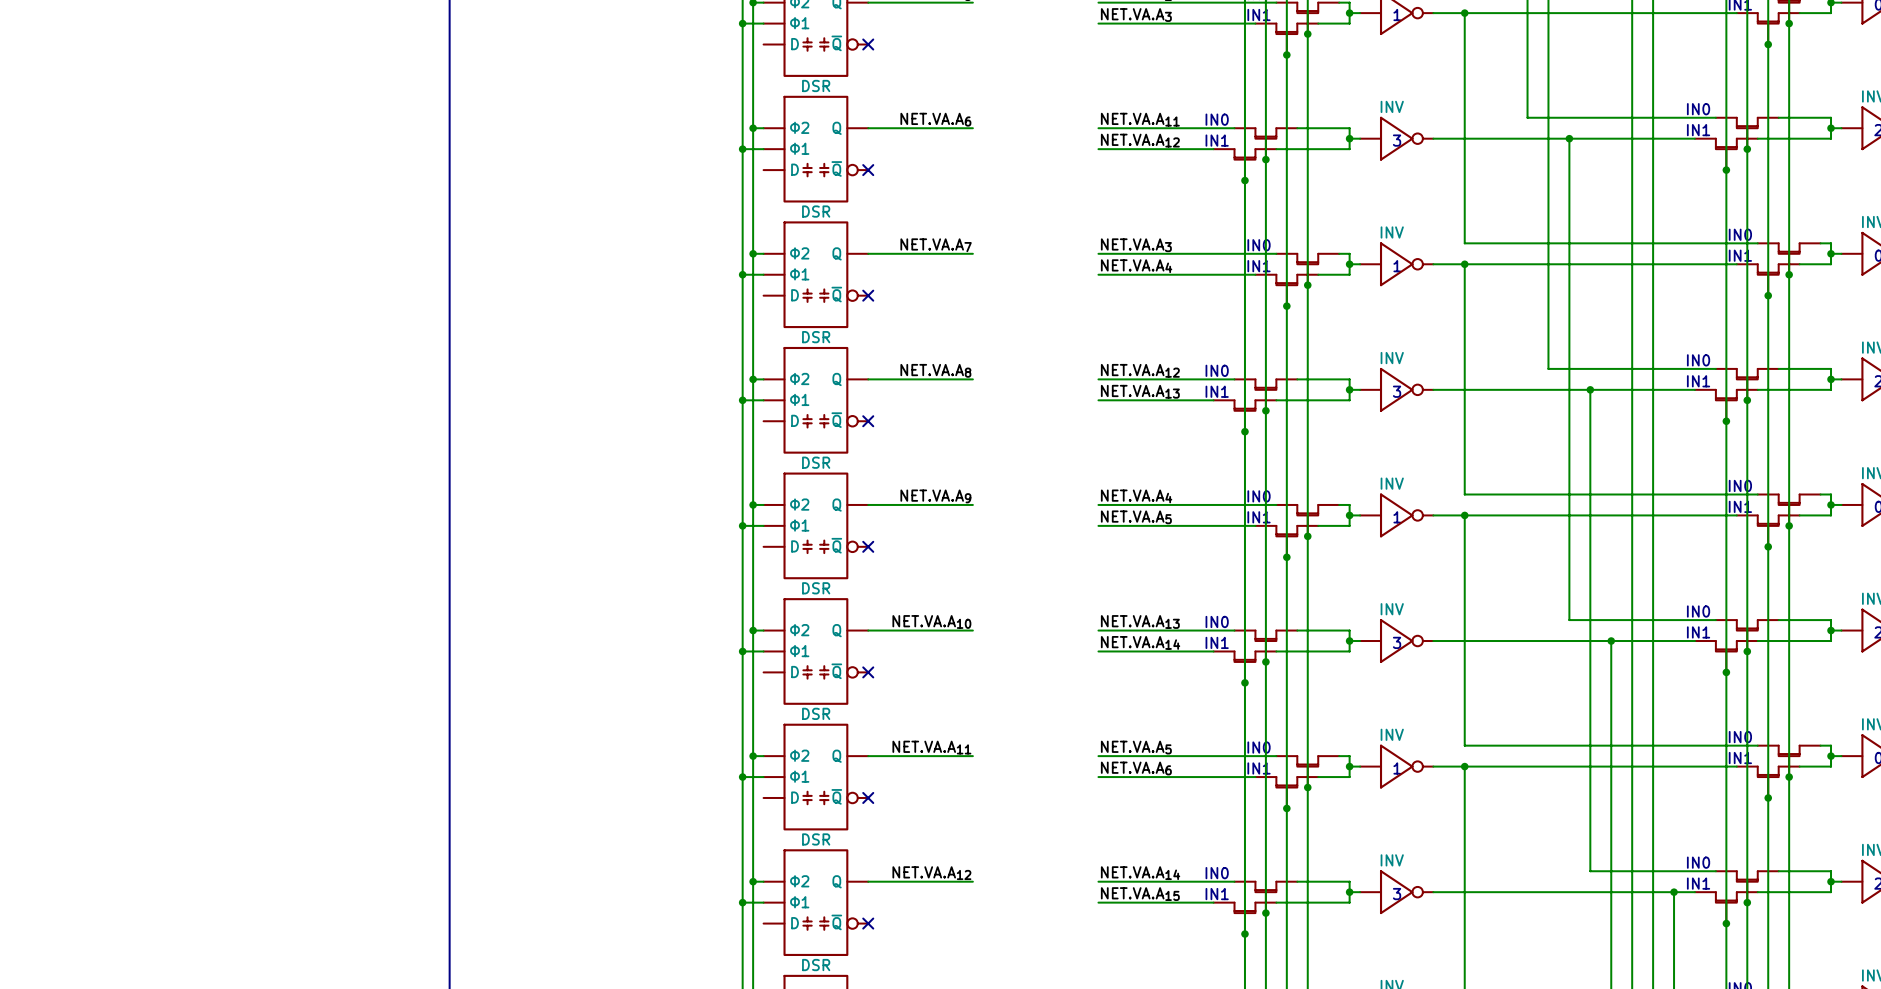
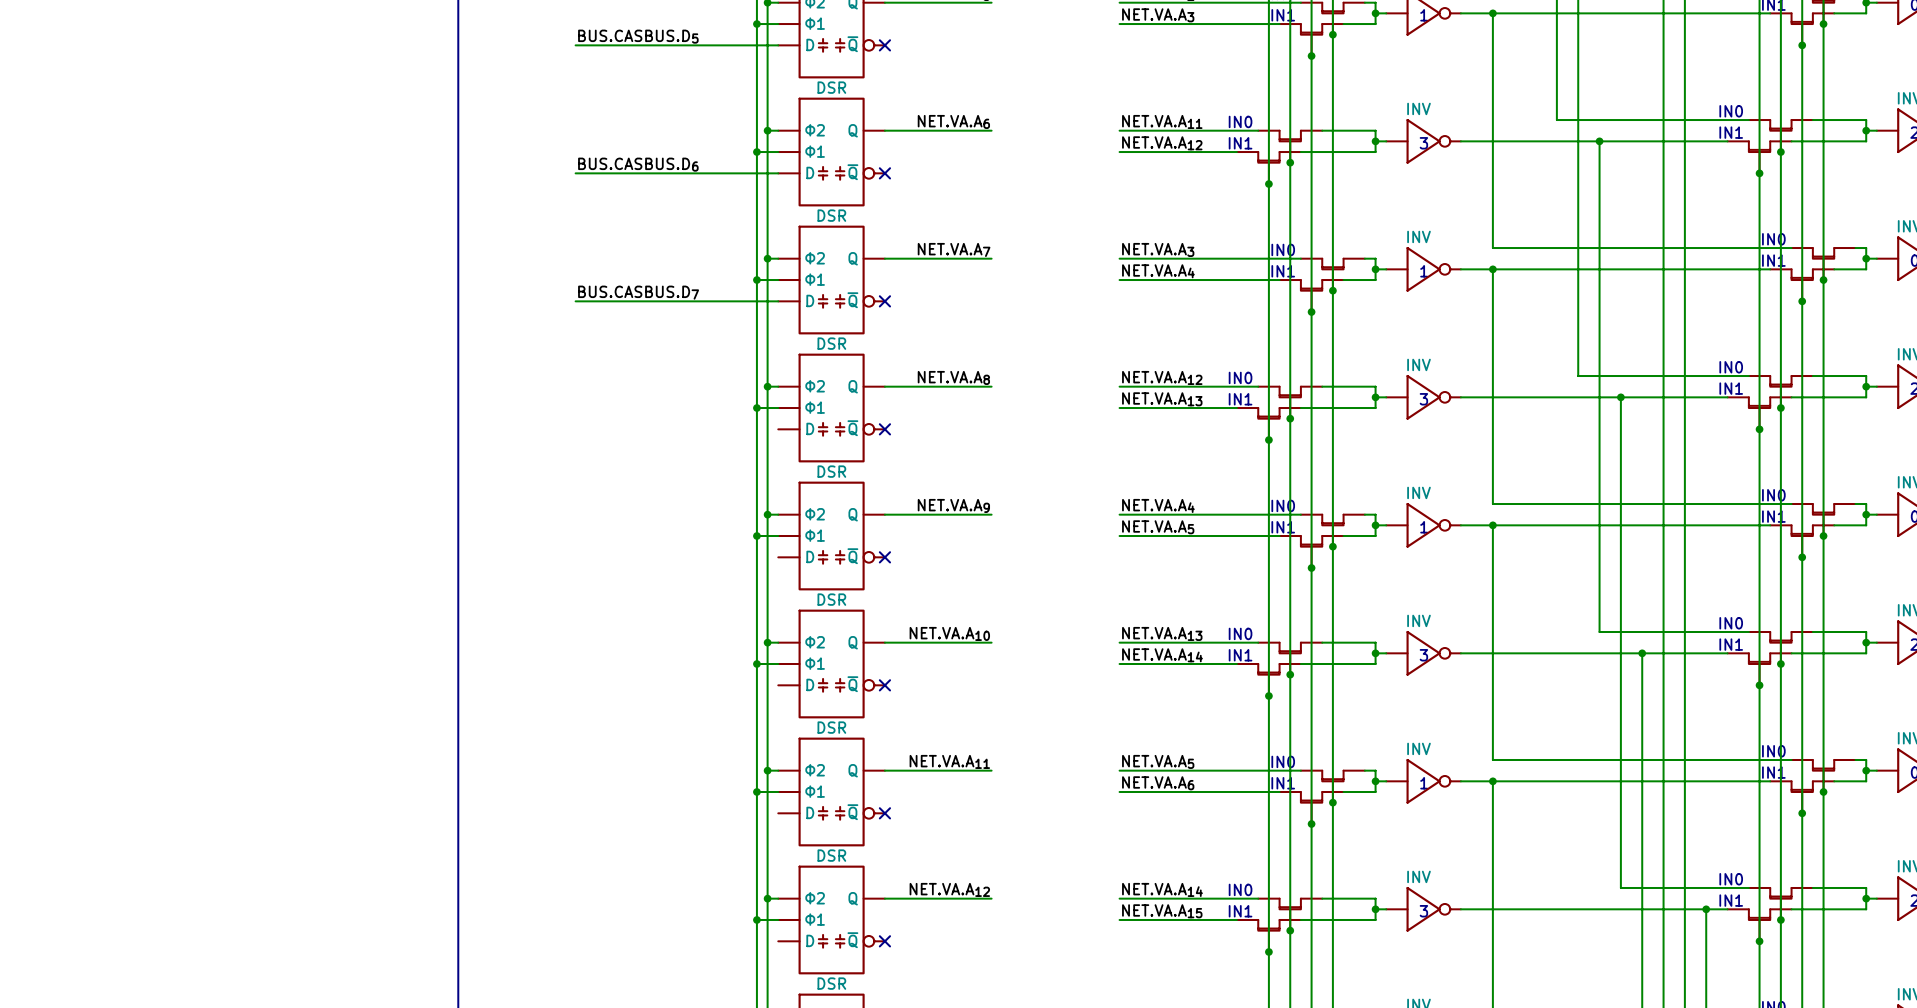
label: none -> BUS.CASBUS.D5 (638, 36)
wire: none -> (575, 45) (778, 45)
label: none -> BUS.CASBUS.D6 (638, 164)
wire: none -> (575, 173) (778, 173)
label: none -> BUS.CASBUS.D7 (638, 292)
wire: none -> (575, 301) (778, 301)

